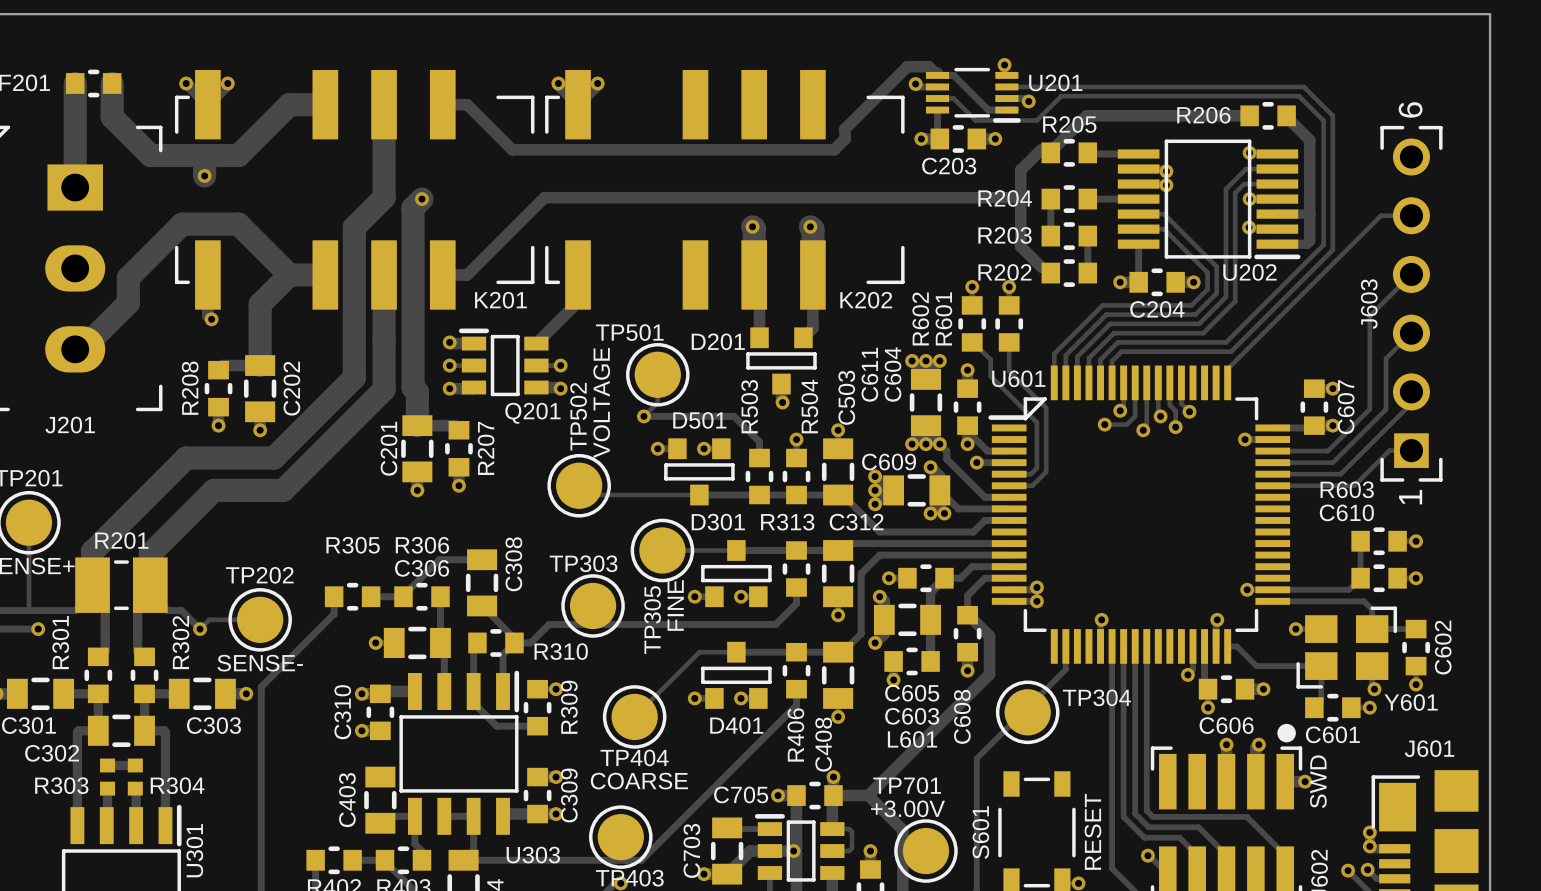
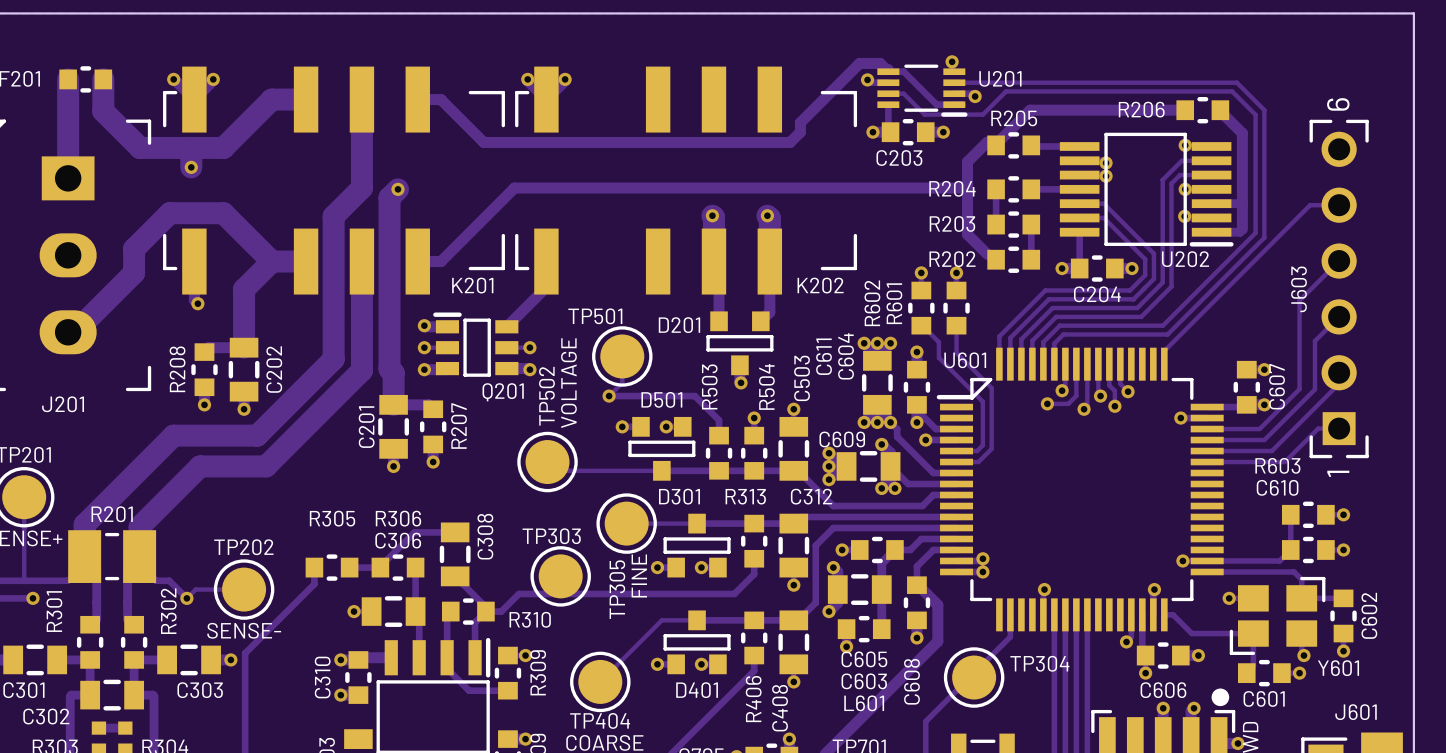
track: (144, 261) (128, 277) (128, 303) -> (134, 248) (134, 272) (118, 288)

